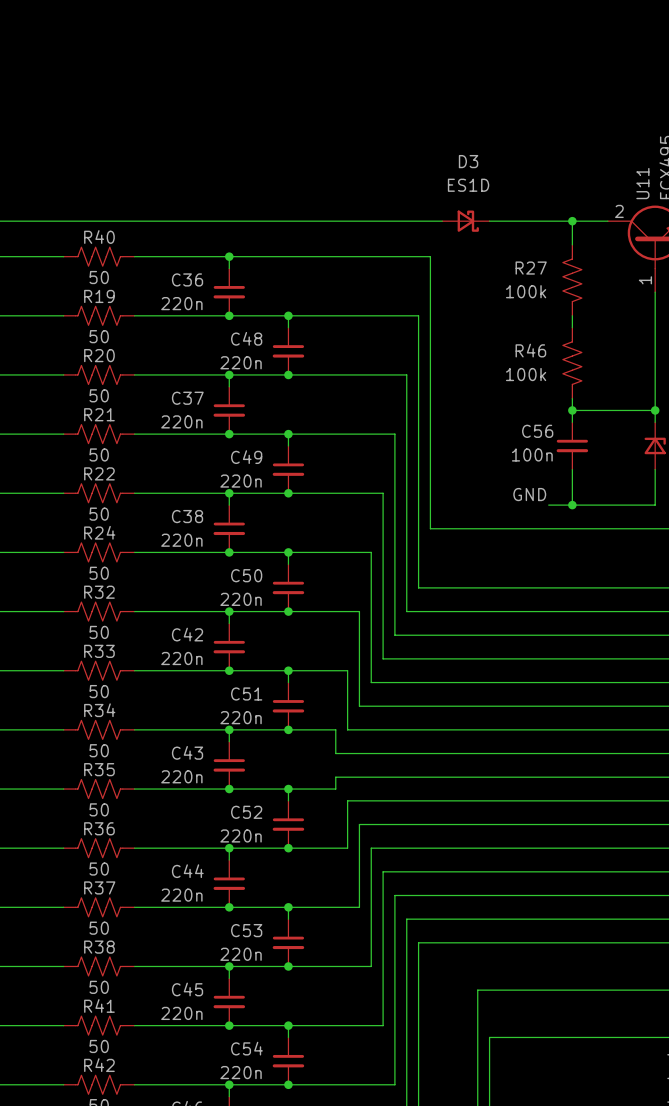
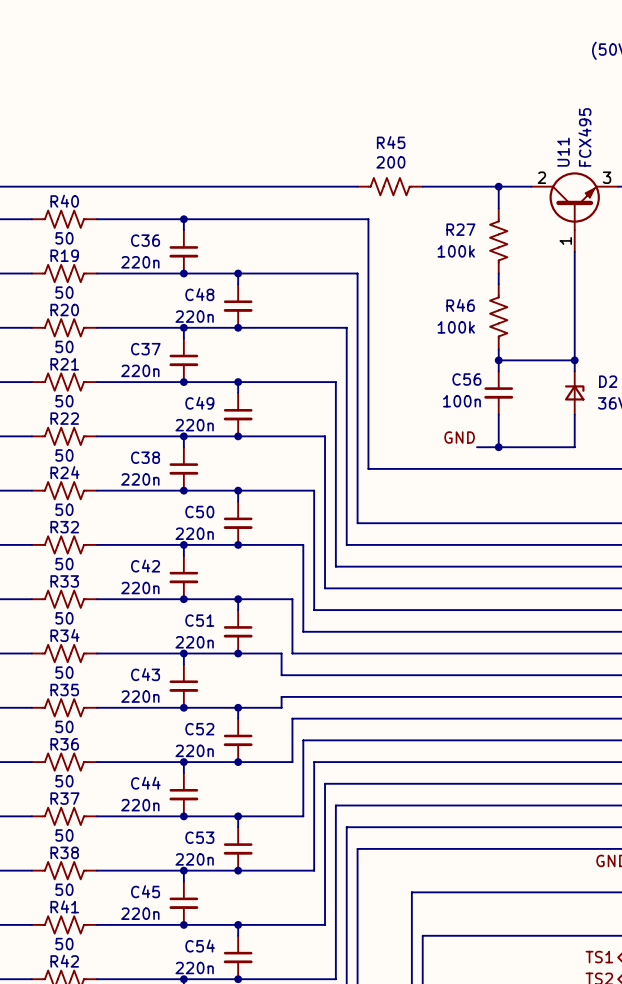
R45: none -> 200 (390, 186)
D3: ES1D (465, 221) -> none

